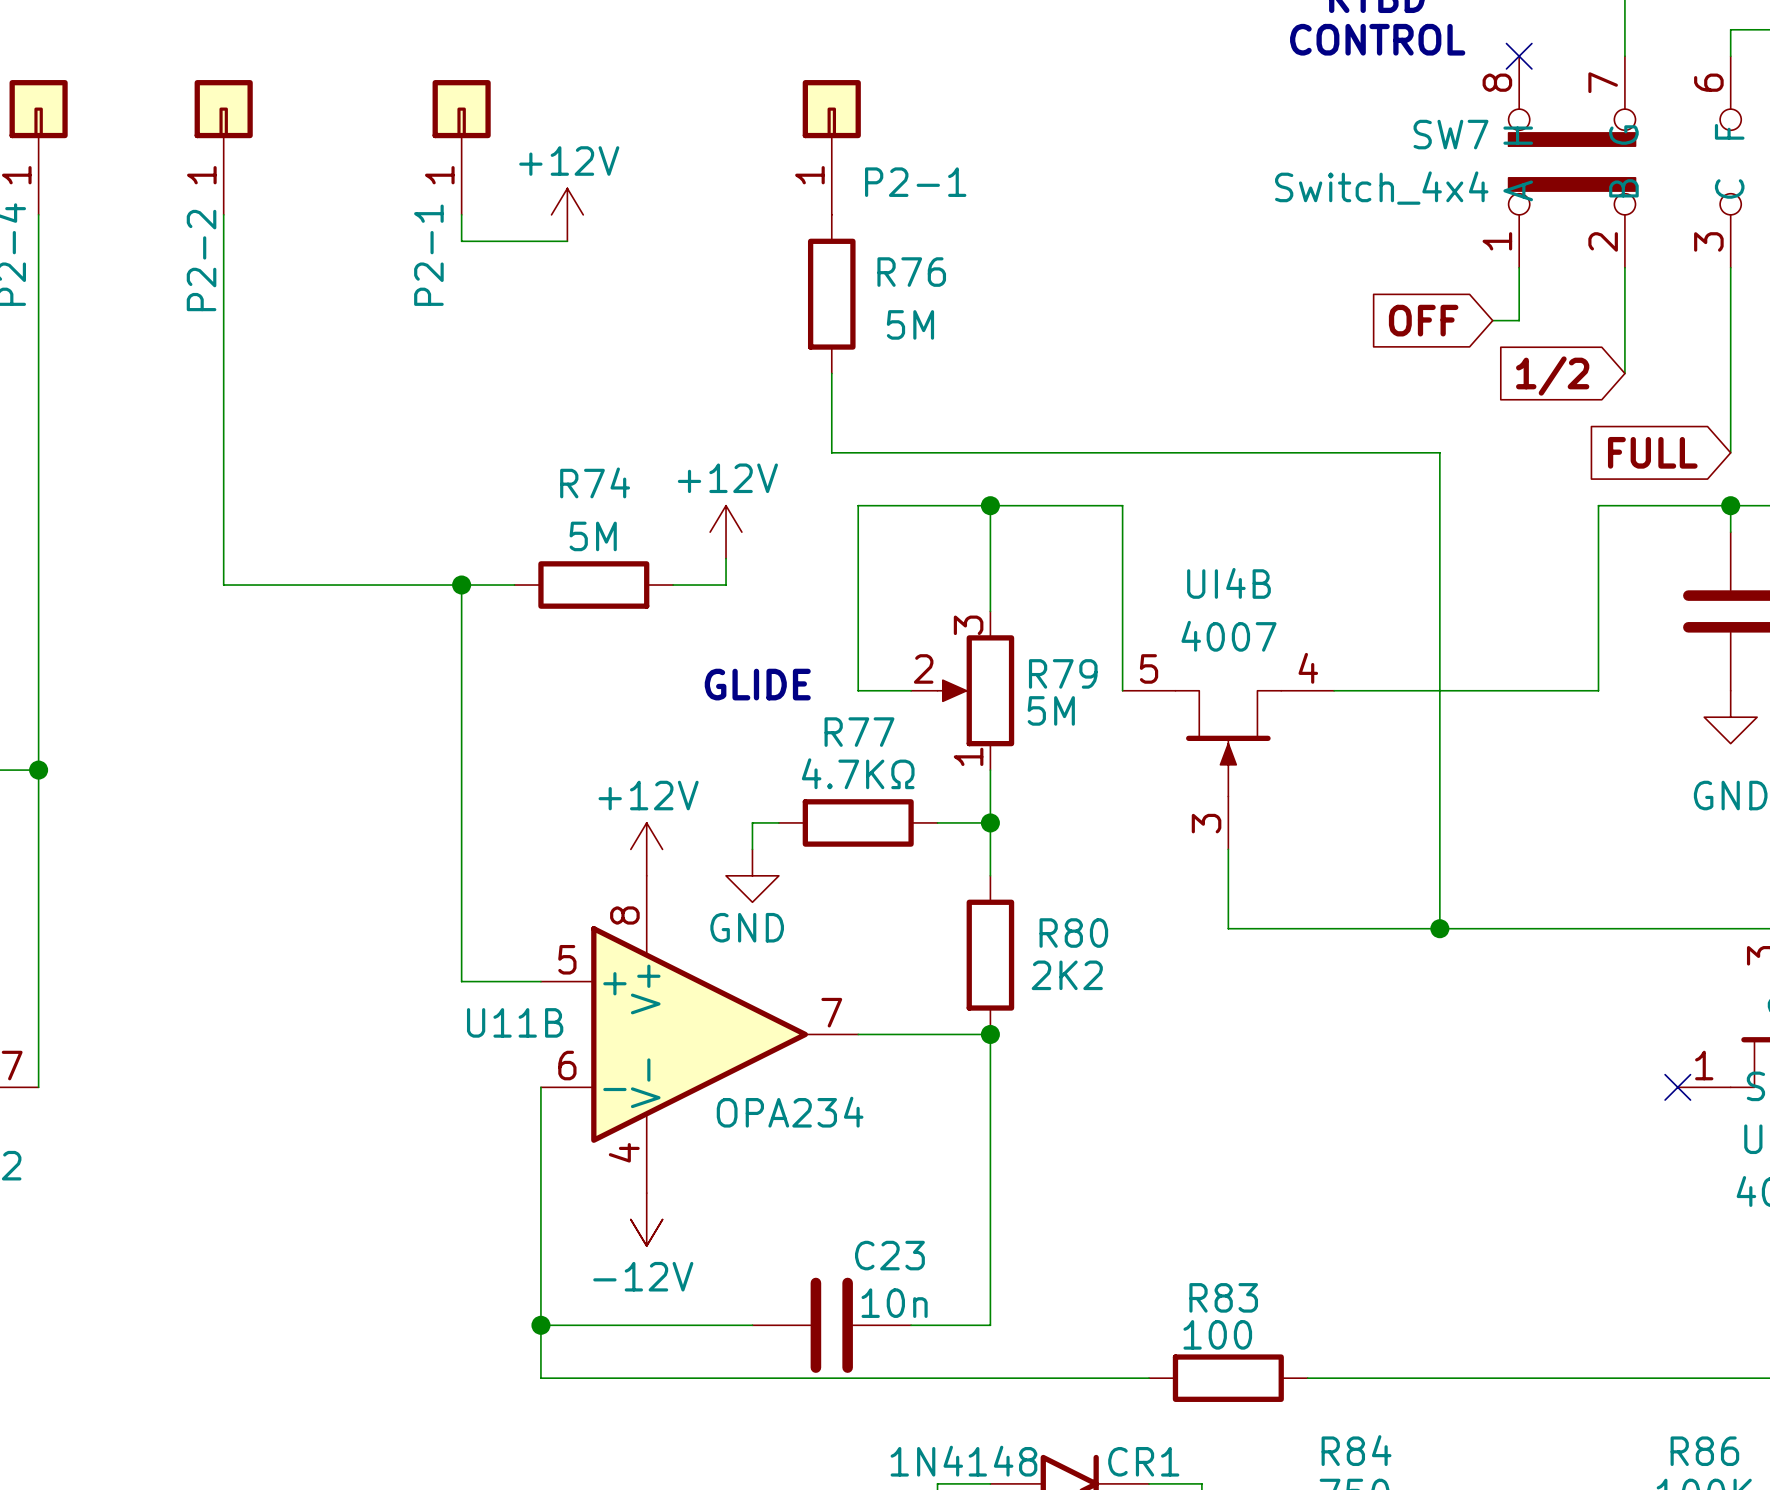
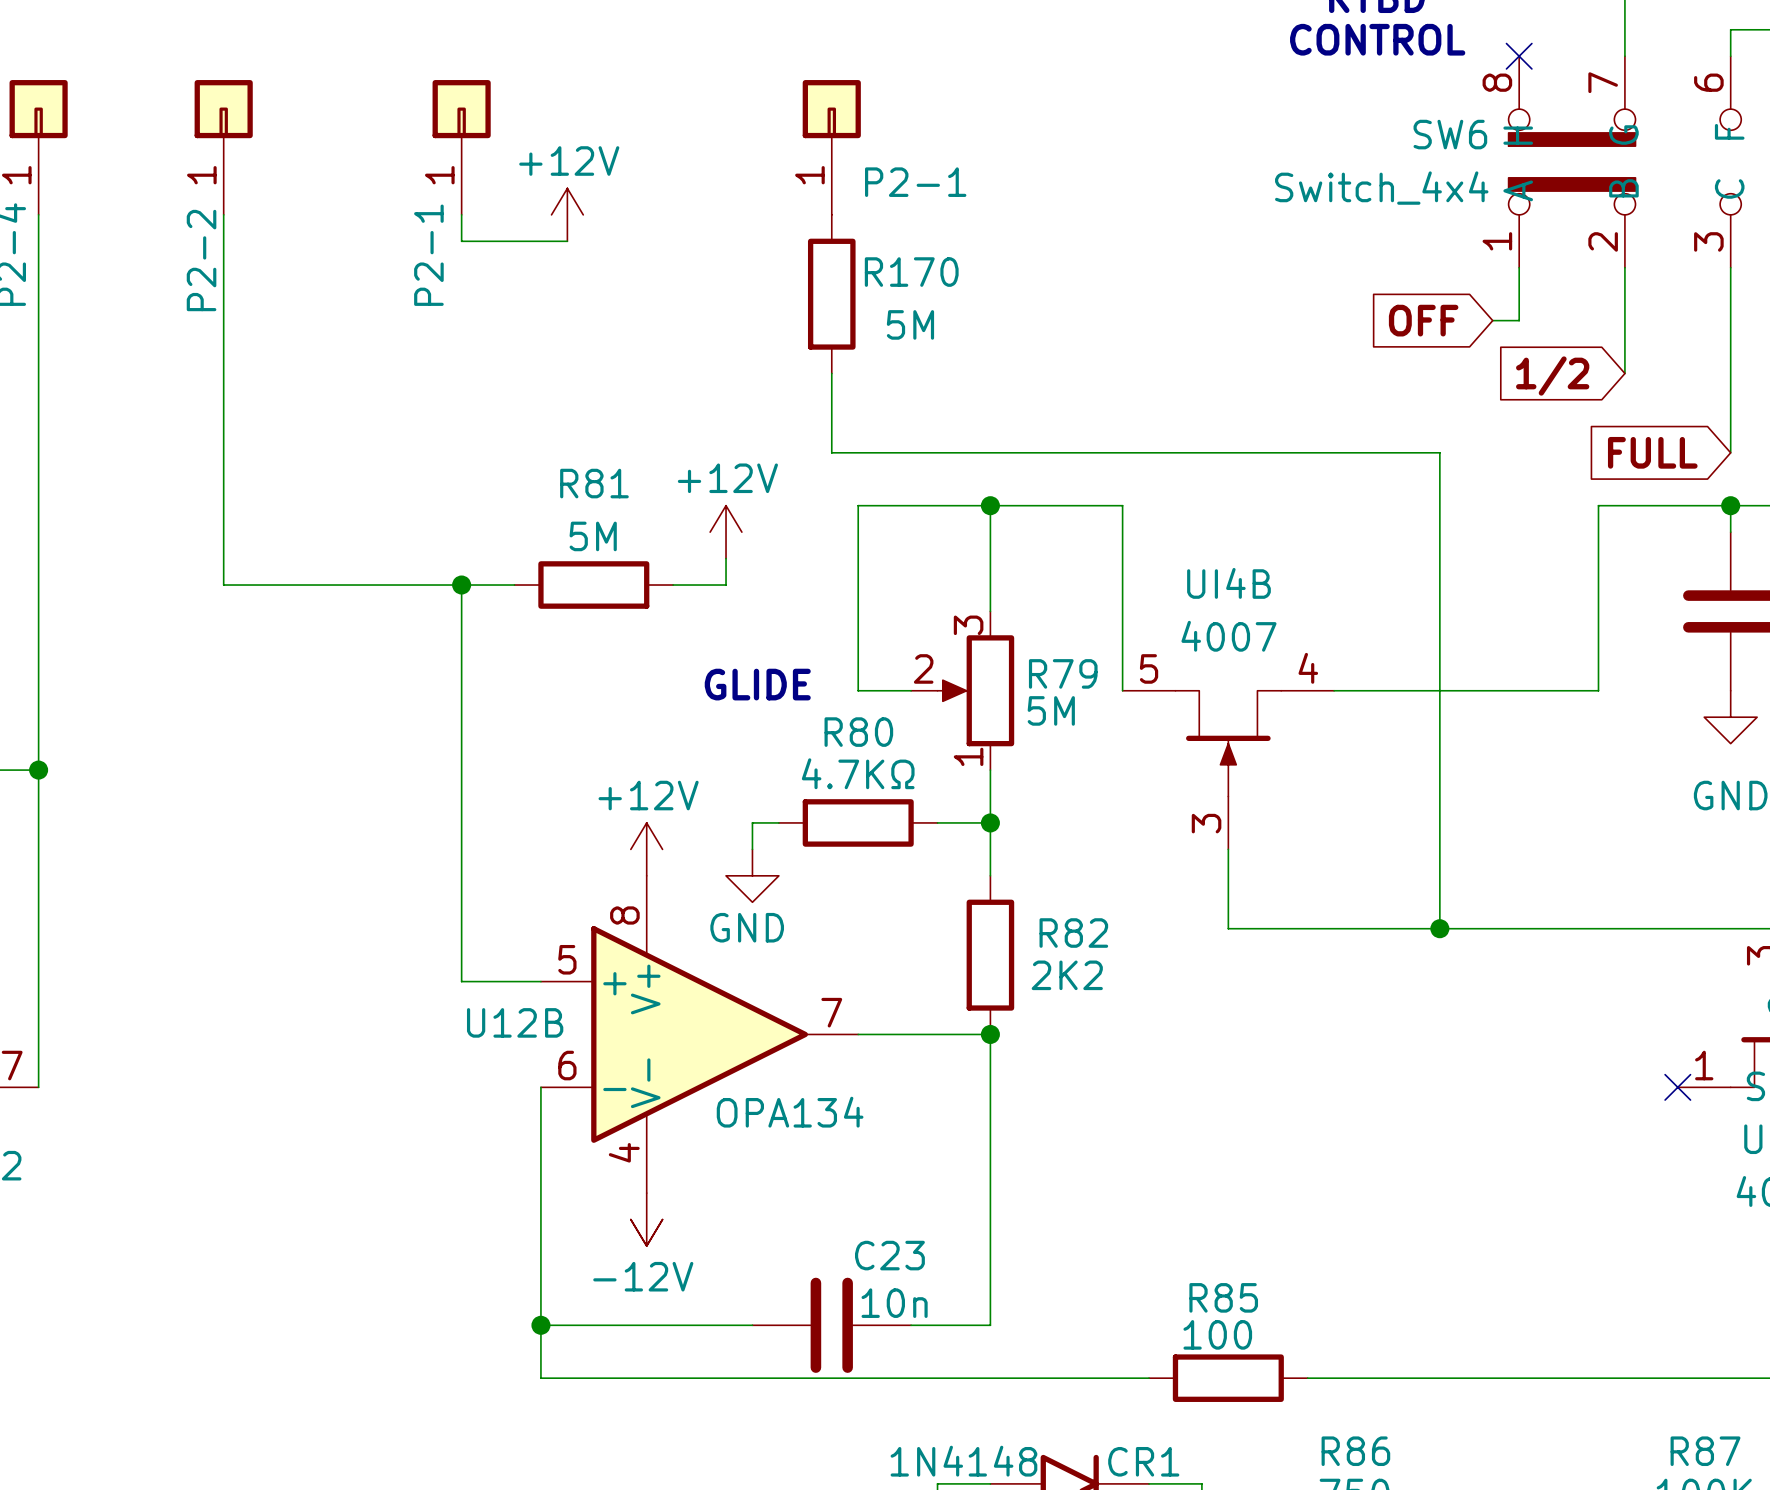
SW7 name: SW7 (1450, 134) -> SW6 (1450, 134)
R76 name: R76 (911, 272) -> R170 (911, 272)
R74 name: R74 (595, 482) -> R81 (594, 483)
R77 name: R77 (859, 732) -> R80 (858, 732)
R80 name: R80 (1073, 933) -> R82 (1073, 933)
U11B name: U11B (515, 1022) -> U12B (515, 1022)
U11B value: OPA234 (790, 1112) -> OPA134 (790, 1112)
R83 name: R83 (1223, 1297) -> R85 (1223, 1297)
R84 name: R84 (1356, 1450) -> R86 (1355, 1451)
R86 name: R86 (1704, 1451) -> R87 (1705, 1451)

